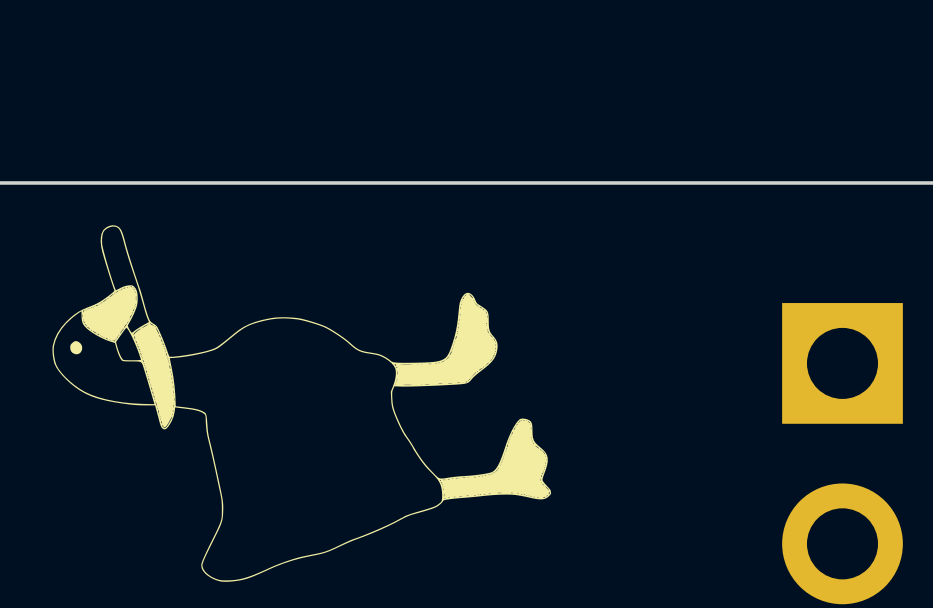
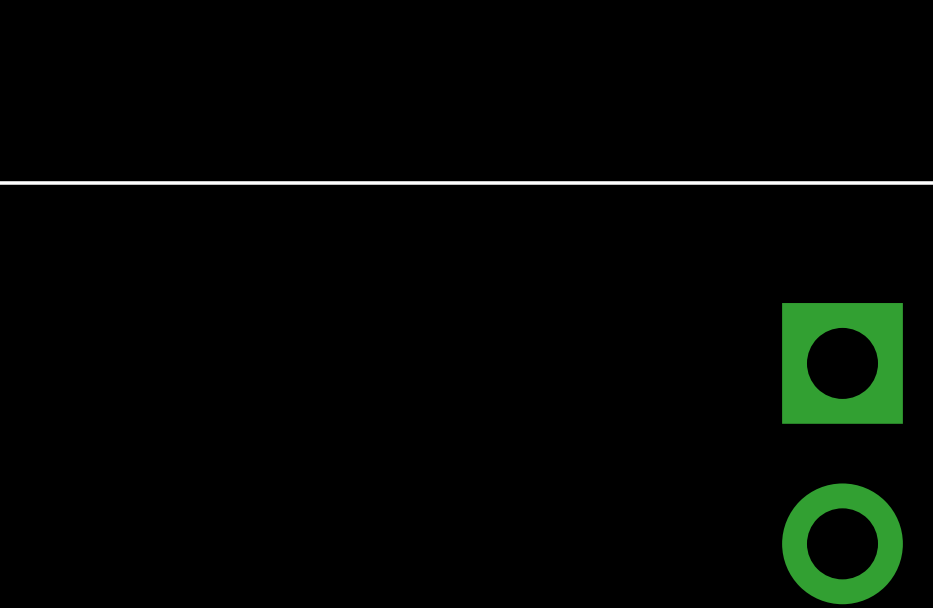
drawing: [52, 225, 552, 582] -> none

